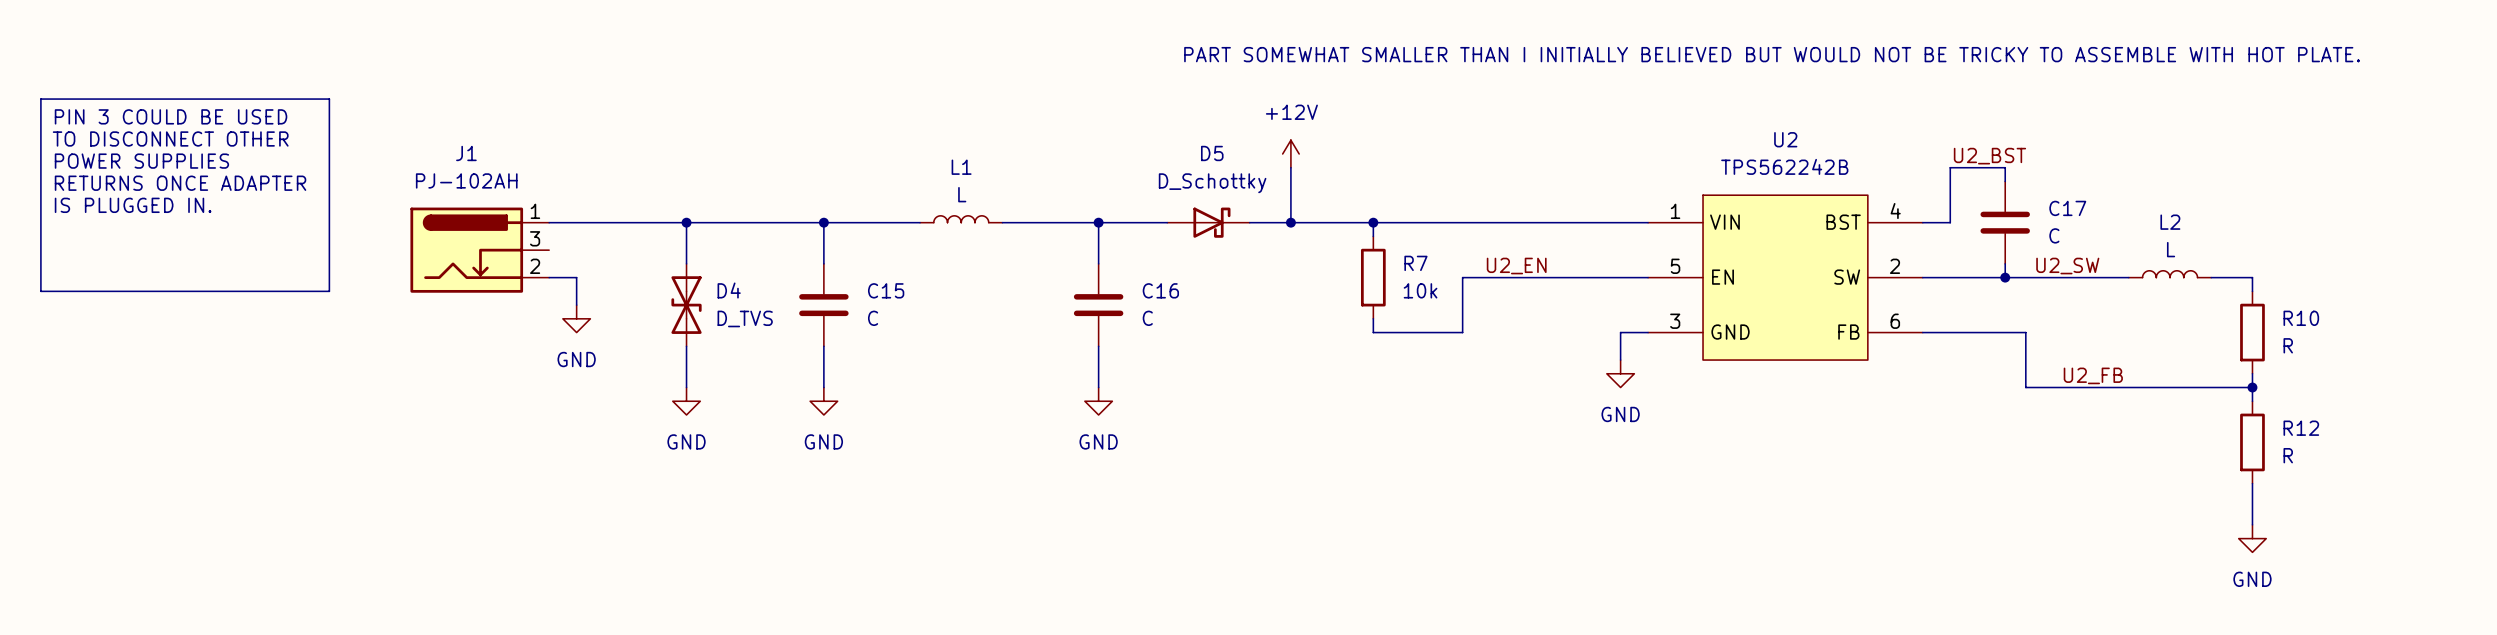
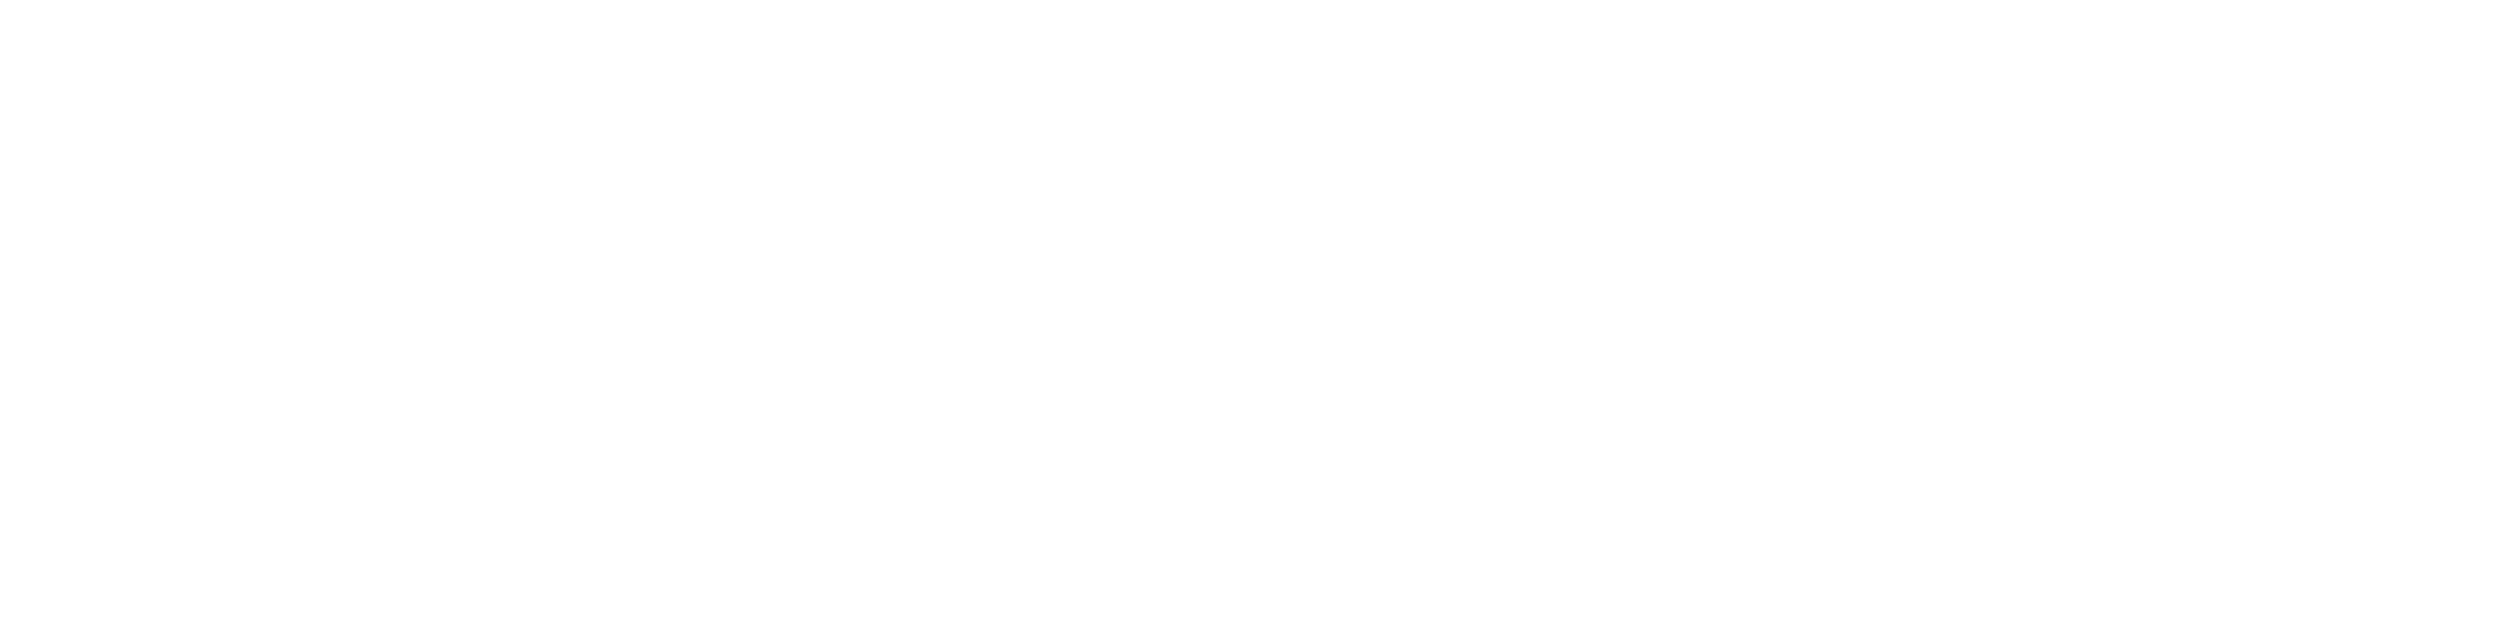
text: PART SOMEWHAT SMALLER THAN I INITIALLY BELIEVED BUT WOULD NOT BE TRICKY TO ASSEMBLE WITH HOT PLATE. (1772, 54) -> none
line: (40, 99) (329, 99) (329, 291) (40, 291) (40, 99) -> none
text: PIN 3 COULD BE USED (171, 116) -> none
text: TO DISCONNECT OTHER (170, 138) -> none
power symbol: +12V (1290, 153) -> none
label: U2_BST (1989, 156) -> none
text: POWER SUPPLIES (141, 161) -> none
wire: (1290, 167) (1290, 222) -> none
wire: (2005, 181) (2005, 167) (1950, 167) (1950, 222) (1922, 222) -> none
text: RETURNS ONCE ADAPTER (180, 183) -> none
text: IS PLUGGED IN. (133, 205) -> none
L1: L (961, 219) -> none
wire: (549, 222) (920, 222) -> none
wire: (686, 222) (686, 263) -> none
junction: (686, 222) -> none
wire: (823, 222) (823, 263) -> none
junction: (823, 222) -> none
wire: (1002, 222) (1167, 222) -> none
wire: (1098, 222) (1098, 263) -> none
junction: (1098, 222) -> none
D5: D_Schottky (1208, 222) -> none
wire: (1249, 222) (1648, 222) -> none
junction: (1290, 222) -> none
wire: (1373, 222) (1373, 236) -> none
junction: (1373, 222) -> none
C17: C (2005, 222) -> none
J1: PJ-102AH (479, 250) -> none
wire: (2005, 263) (2005, 277) -> none
label: U2_EN (1516, 266) -> none
label: U2_SW (2067, 266) -> none
L2: L (2170, 274) -> none
wire: (549, 277) (576, 277) (576, 305) -> none
R7: 10k (1373, 277) -> none
wire: (1648, 277) (1462, 277) (1462, 332) (1373, 332) (1373, 318) -> none
U2: TPS562242B (1785, 277) -> none
wire: (1922, 277) (2128, 277) -> none
junction: (2005, 277) -> none
wire: (2211, 277) (2252, 277) (2252, 291) -> none
D4: D_TVS (686, 305) -> none
C15: C (823, 305) -> none
C16: C (1098, 305) -> none
power symbol: GND (576, 318) -> none
wire: (1648, 332) (1620, 332) (1620, 360) -> none
wire: (1922, 332) (2025, 332) (2025, 387) (2252, 387) -> none
R10: R (2252, 332) -> none
wire: (686, 346) (686, 387) -> none
wire: (823, 346) (823, 387) -> none
wire: (1098, 346) (1098, 387) -> none
power symbol: GND (1620, 373) -> none
wire: (2252, 373) (2252, 401) -> none
label: U2_FB (2093, 375) -> none
junction: (2252, 387) -> none
power symbol: GND (686, 401) -> none
power symbol: GND (823, 401) -> none
power symbol: GND (1098, 401) -> none
R12: R (2252, 442) -> none
wire: (2252, 483) (2252, 524) -> none
power symbol: GND (2252, 538) -> none

